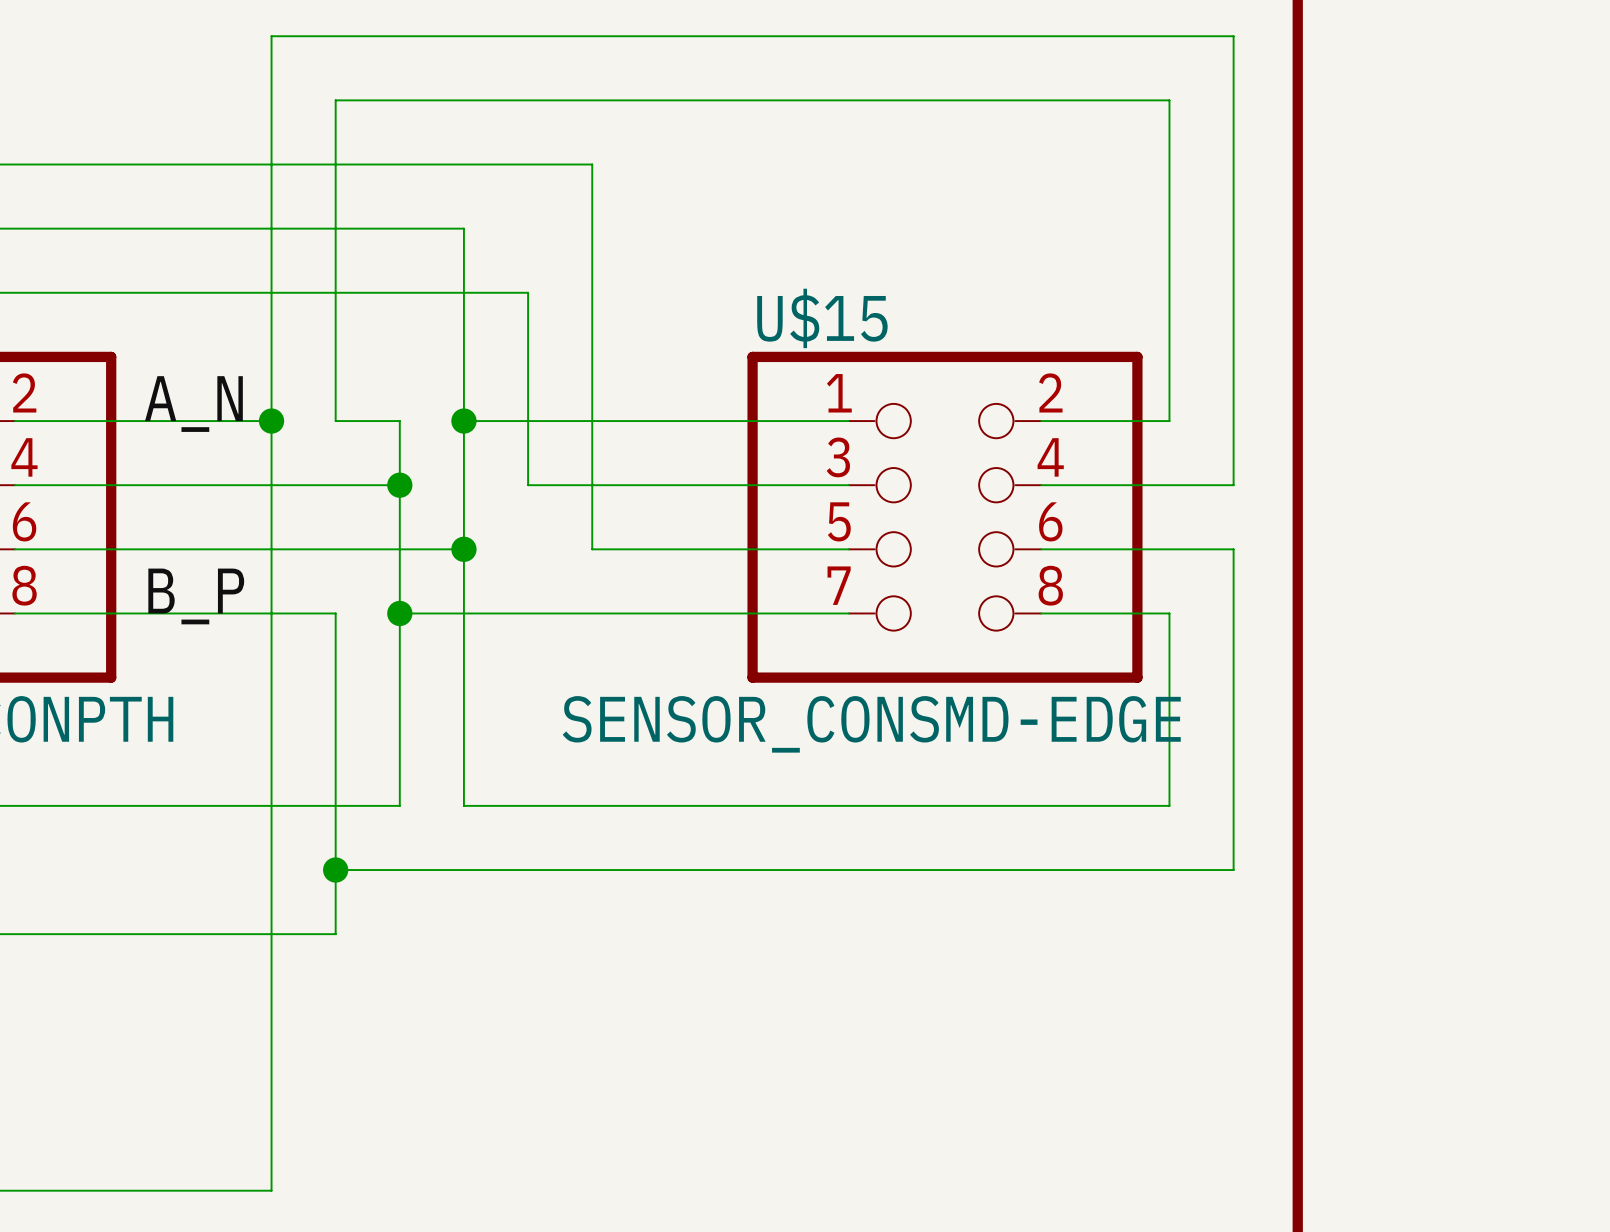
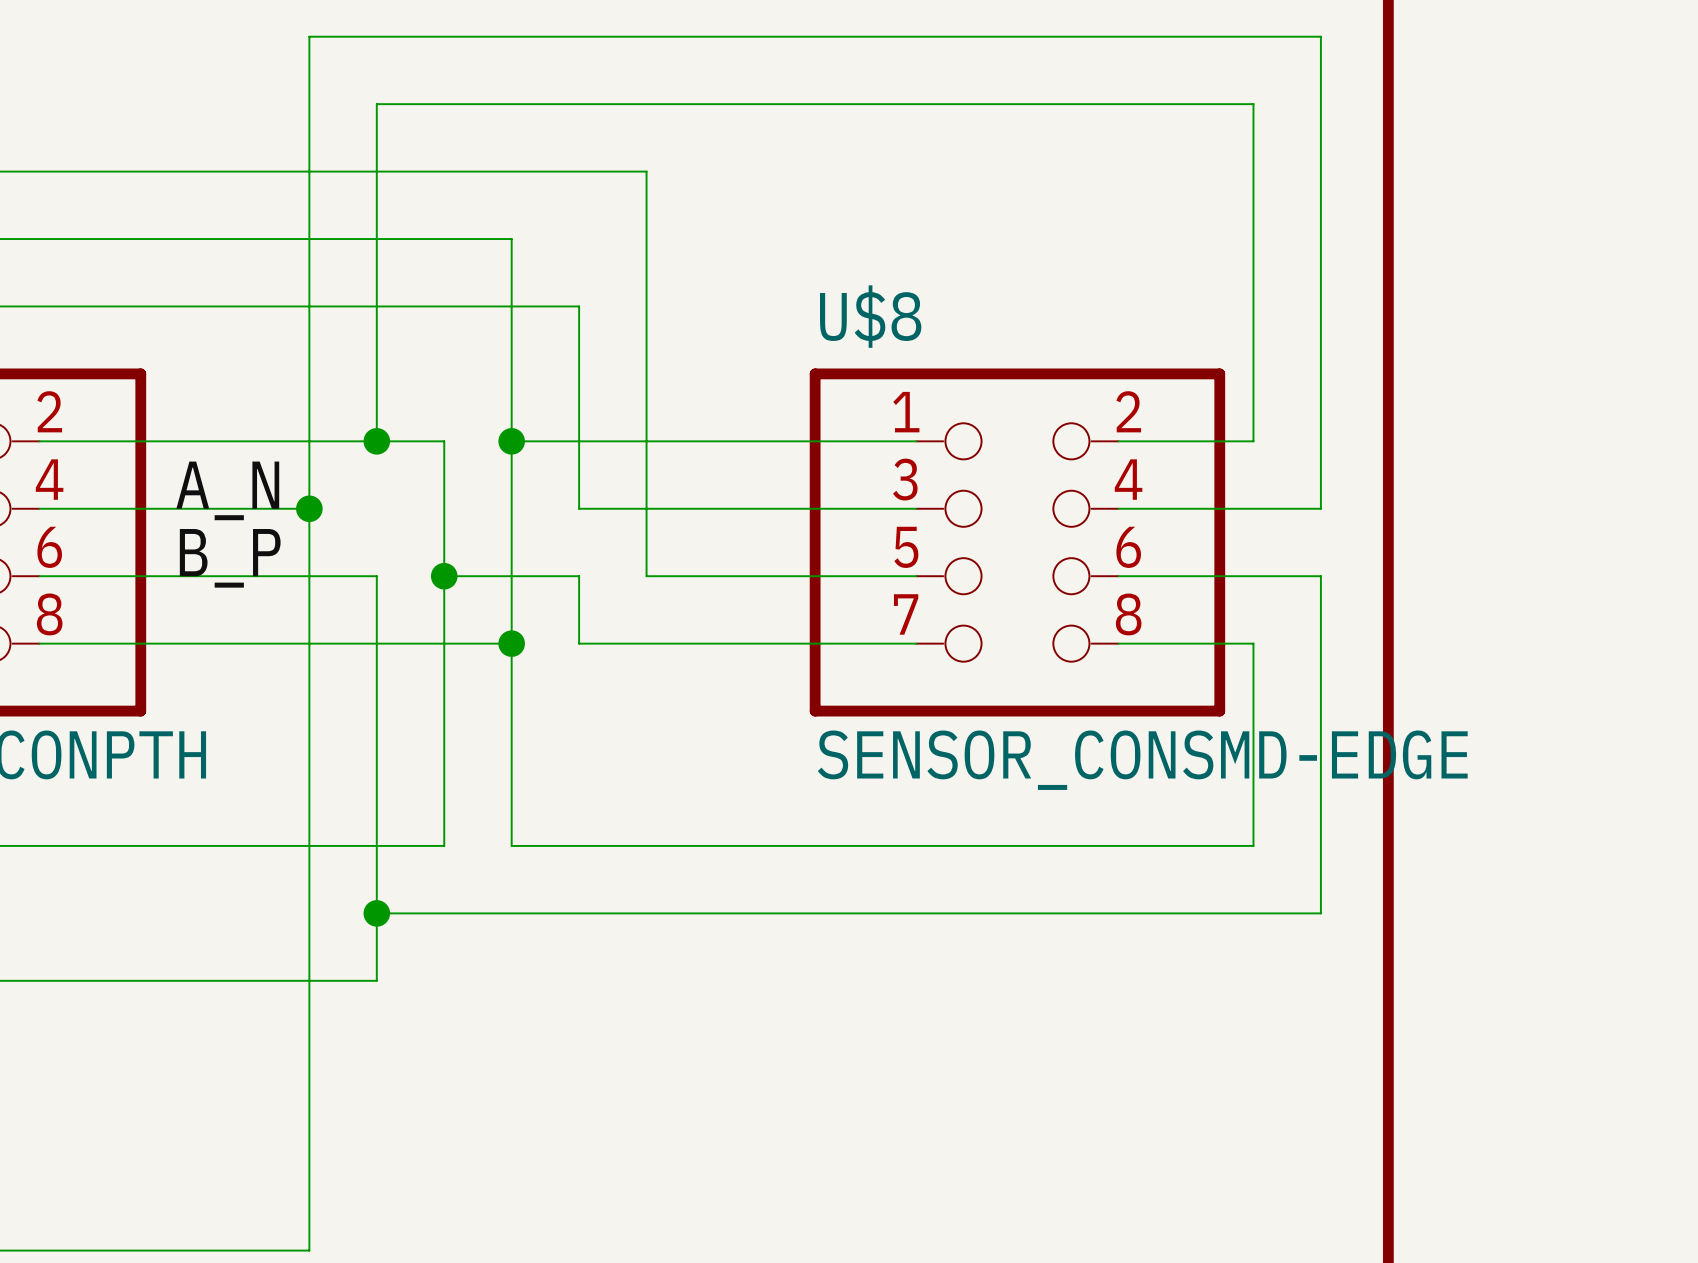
U$15 name: U$15 (822, 318) -> U$8 (870, 316)
label position: A_N (193, 404) -> A_N (227, 490)
wire: none -> (309, 441) (376, 441)
junction: (271, 421) -> none
junction: none -> (376, 441)
wire: (271, 485) (399, 485) -> none
junction: none -> (309, 508)
junction: (399, 485) -> none
wire: (335, 549) (399, 549) -> (376, 576) (376, 643) (444, 643)
junction: none -> (444, 576)
junction: (463, 549) -> none
label position: B_P (196, 596) -> B_P (230, 558)
junction: (399, 613) -> none
wire: (463, 613) (528, 613) -> (511, 576) (579, 576) (579, 643)
junction: none -> (511, 643)
U$15 value position: SENSOR_CONSMD-EDGE (871, 724) -> SENSOR_CONSMD-EDGE (1142, 760)

